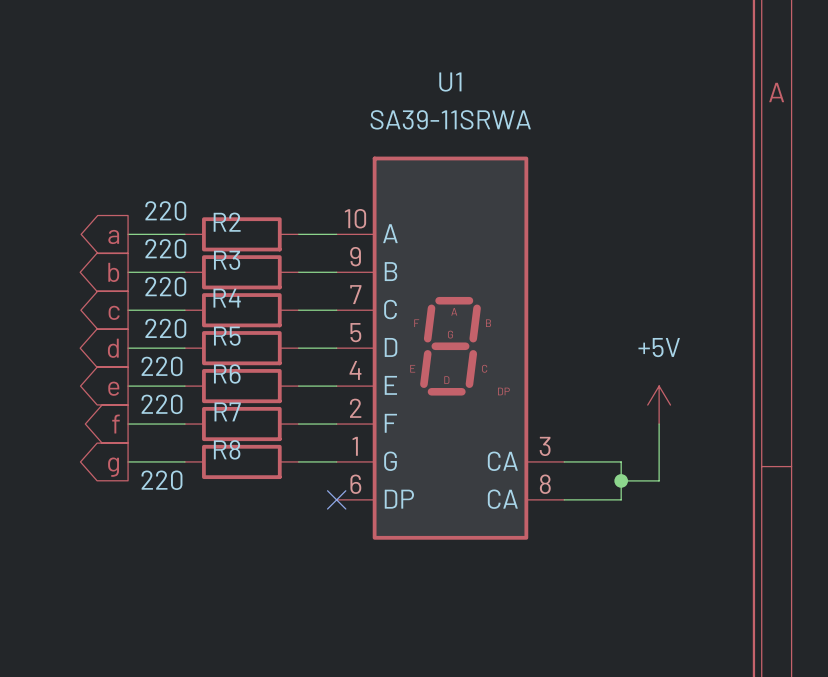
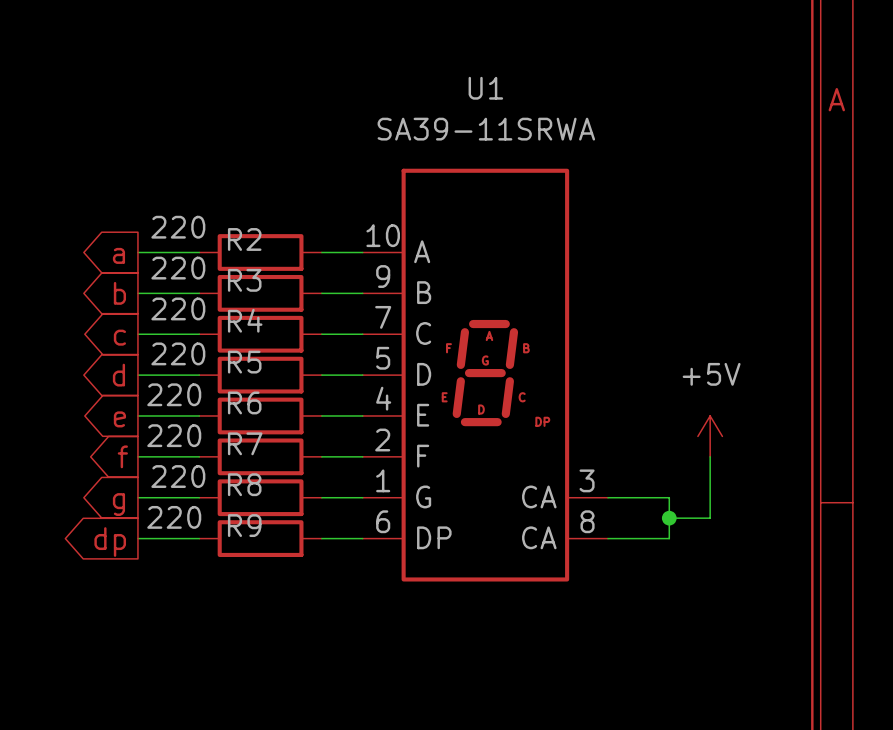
wire: none -> (137, 538) (199, 538)
R9: none -> 220 (260, 538)
wire: none -> (321, 538) (362, 538)
no-connect mark: (336, 499) -> none
global label: none -> dp (110, 542)

